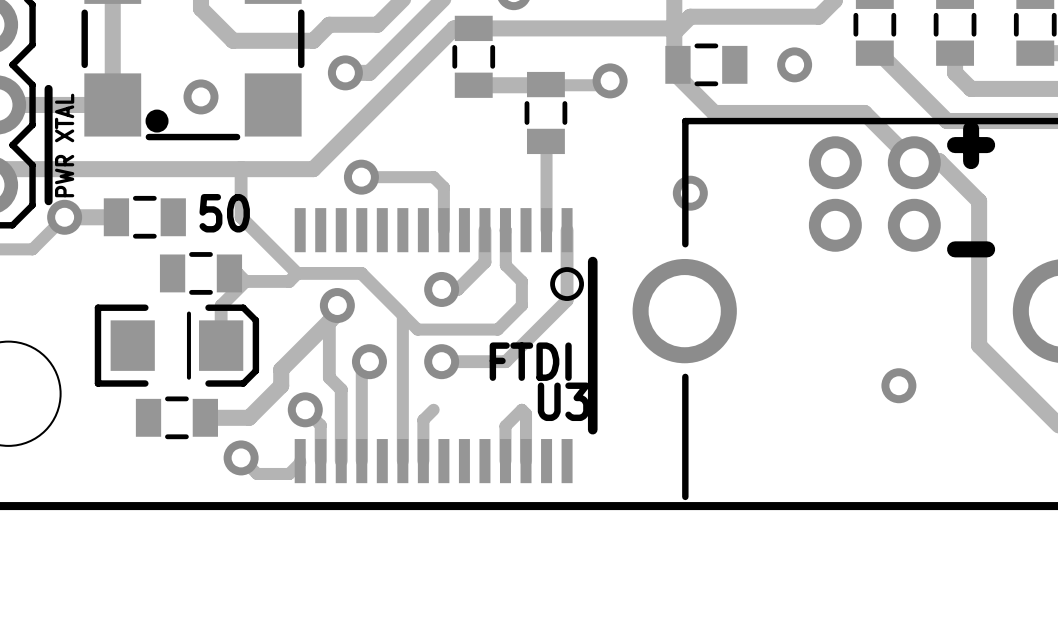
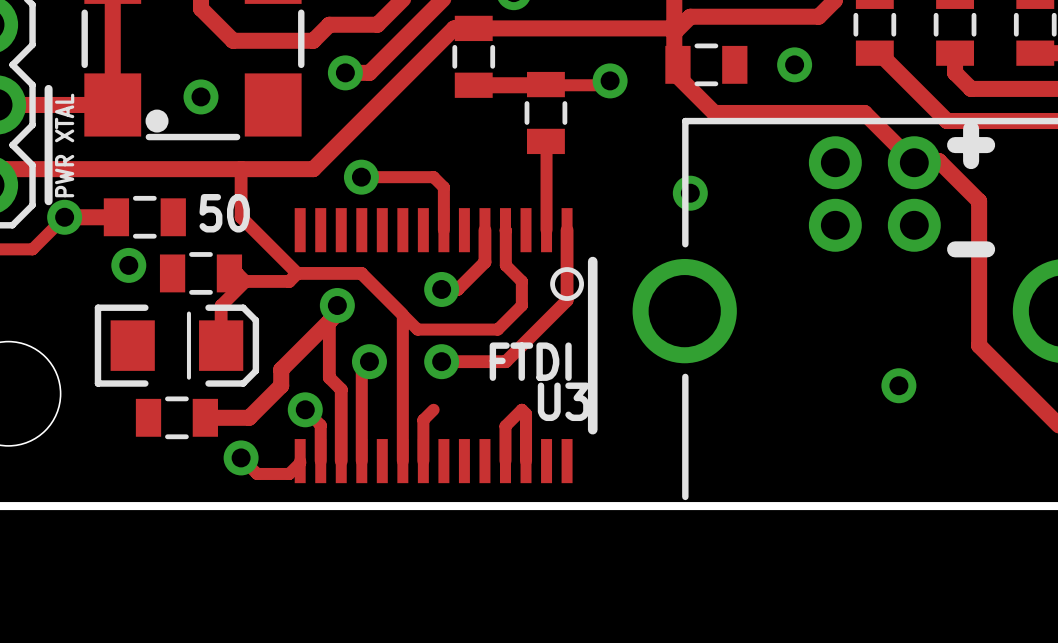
via: none -> (128, 265)

